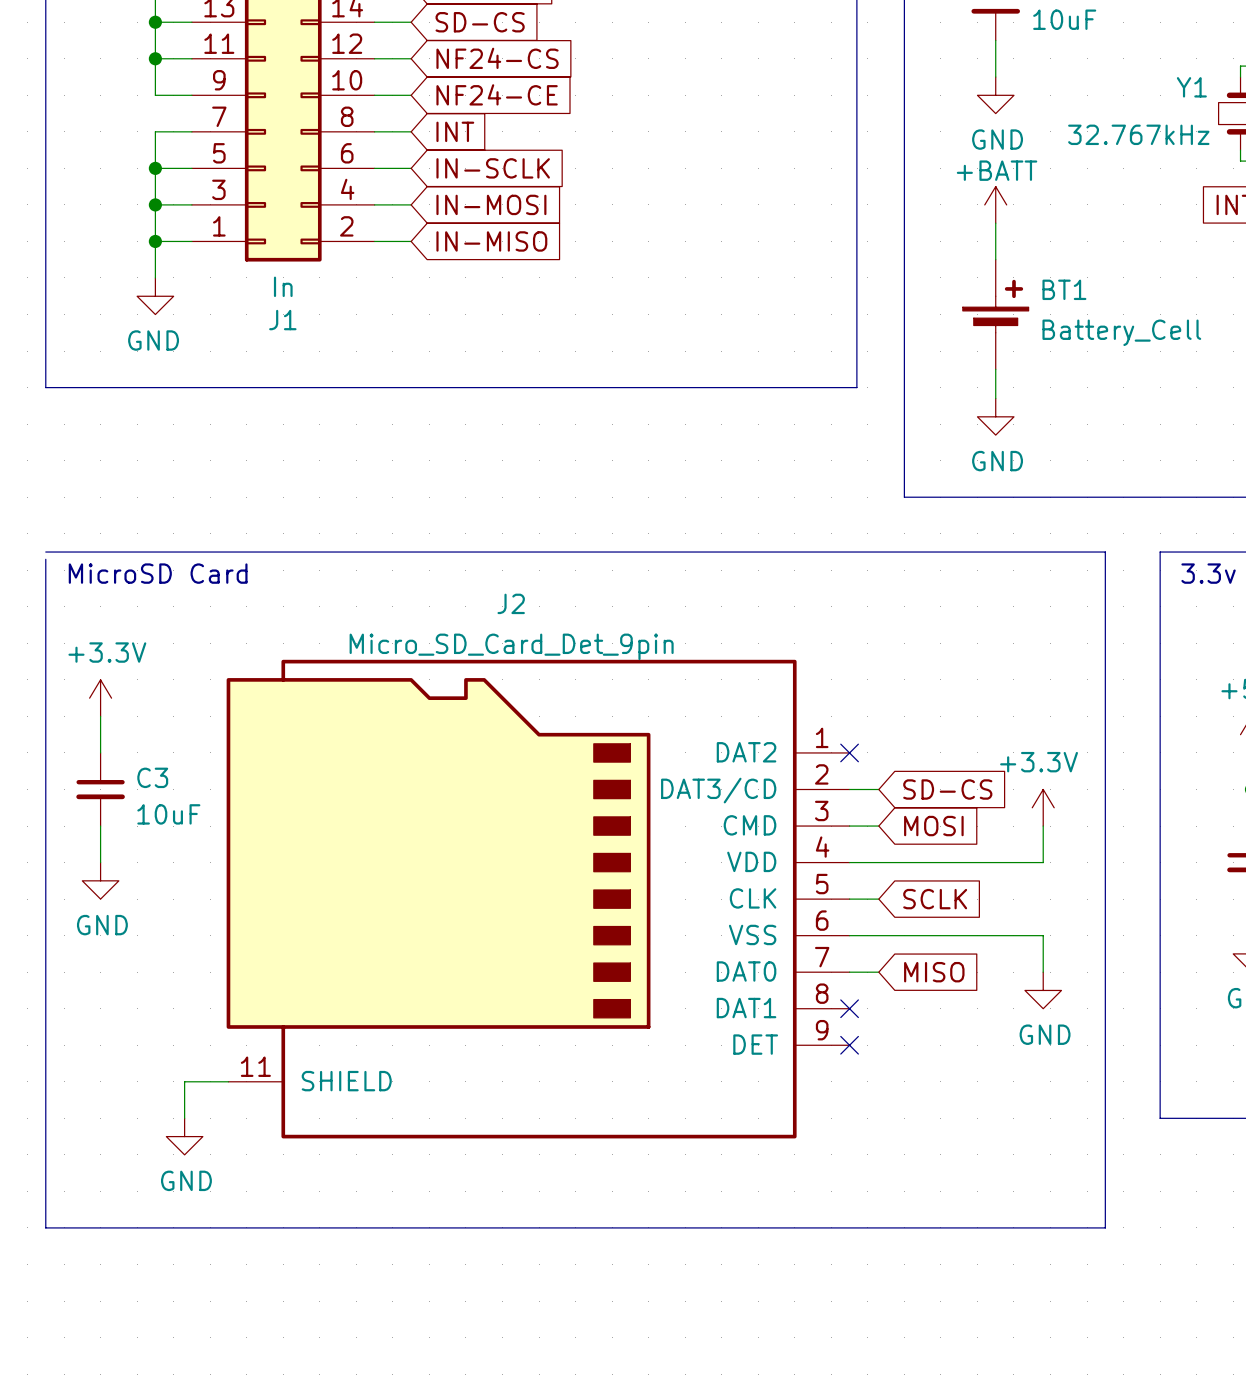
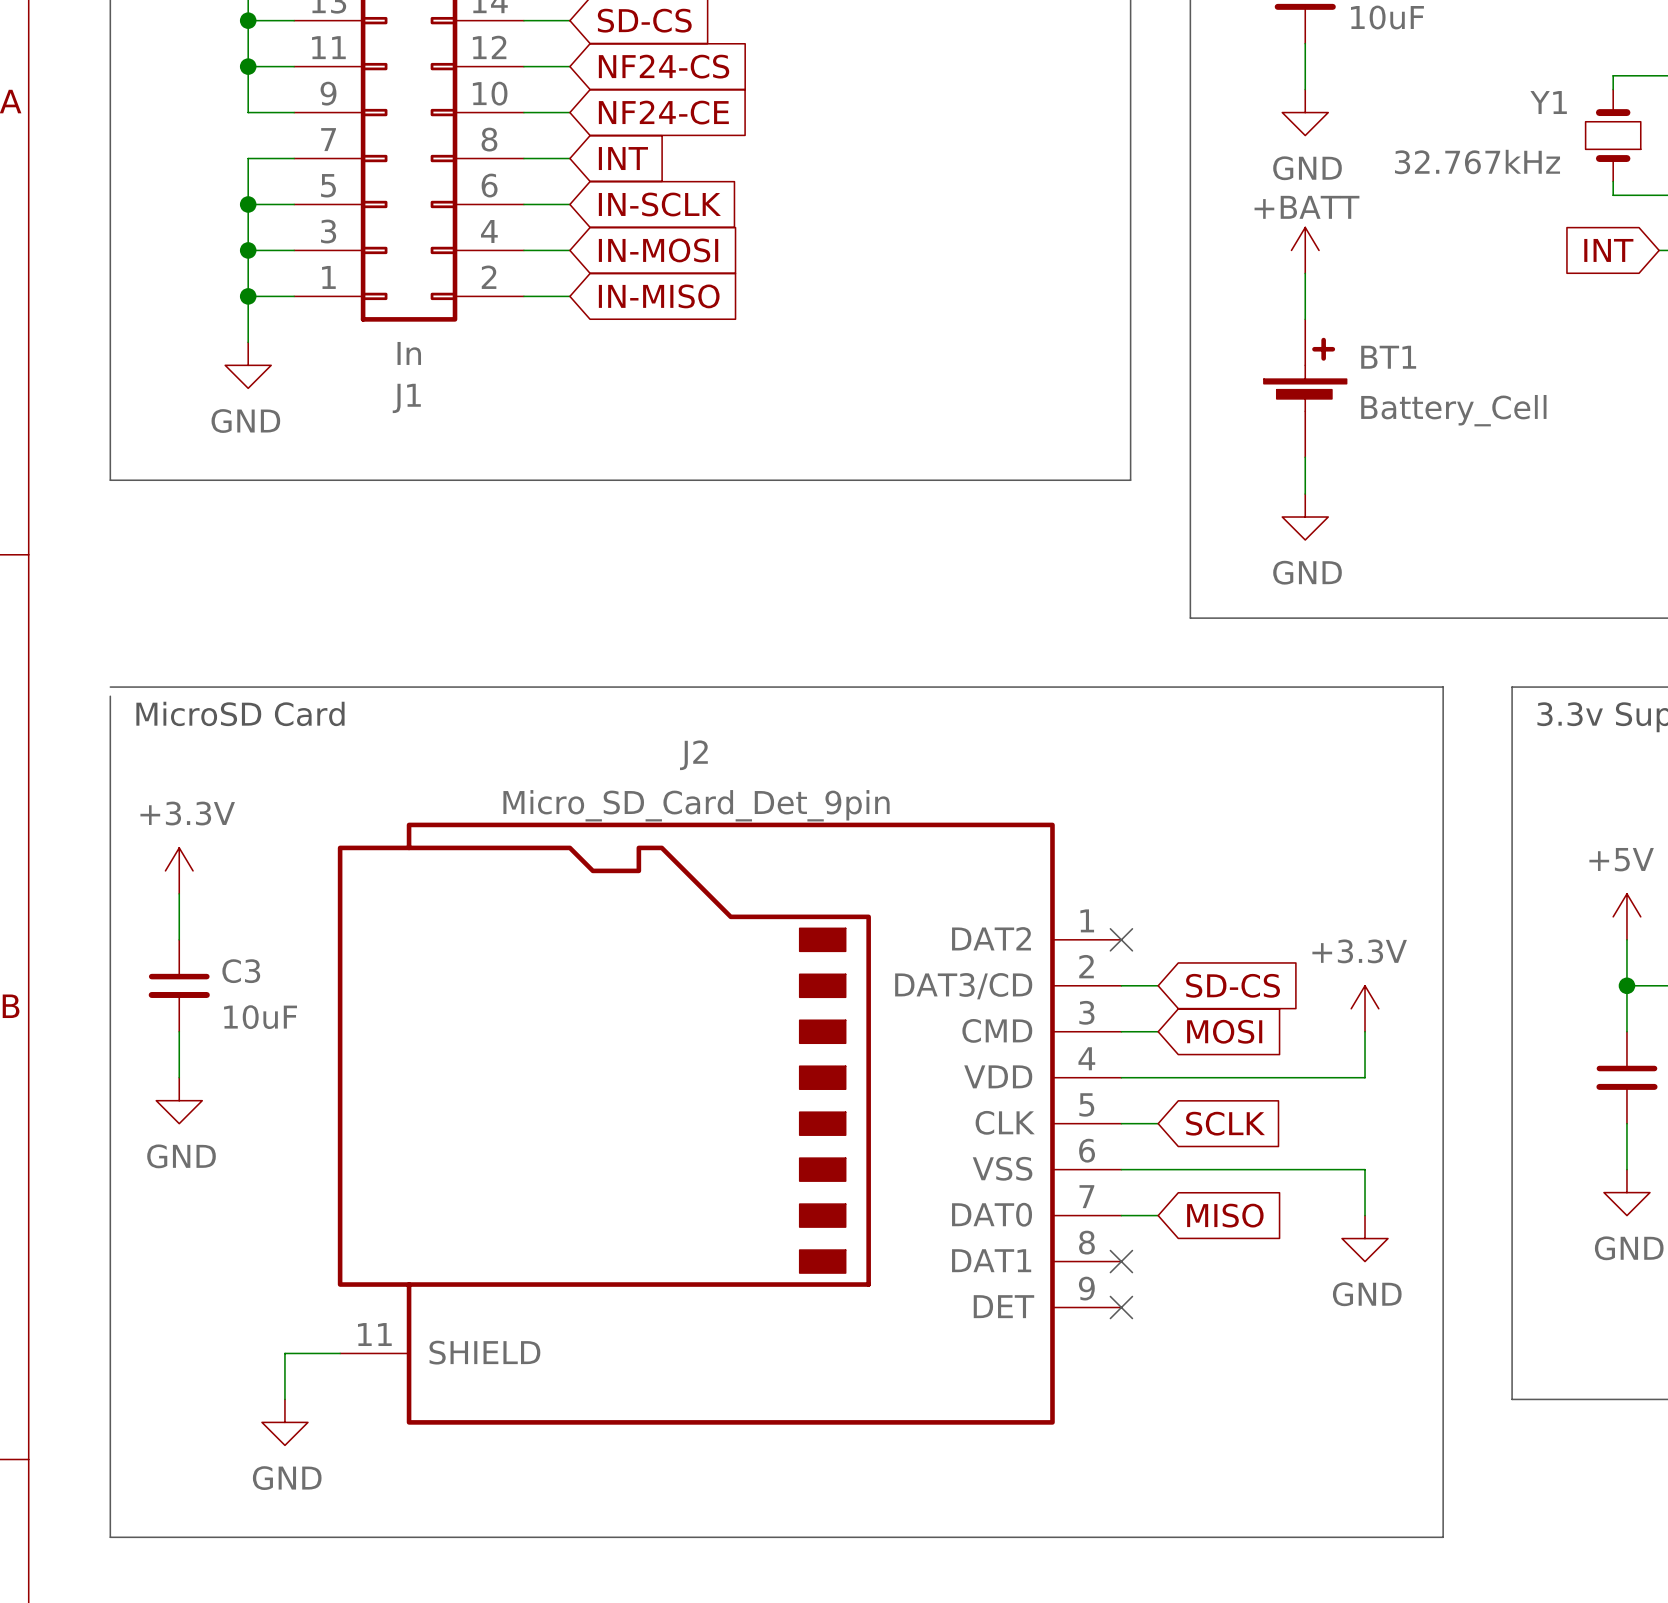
BT1 symbol: [962, 259, 1029, 370] -> [1263, 319, 1347, 458]

